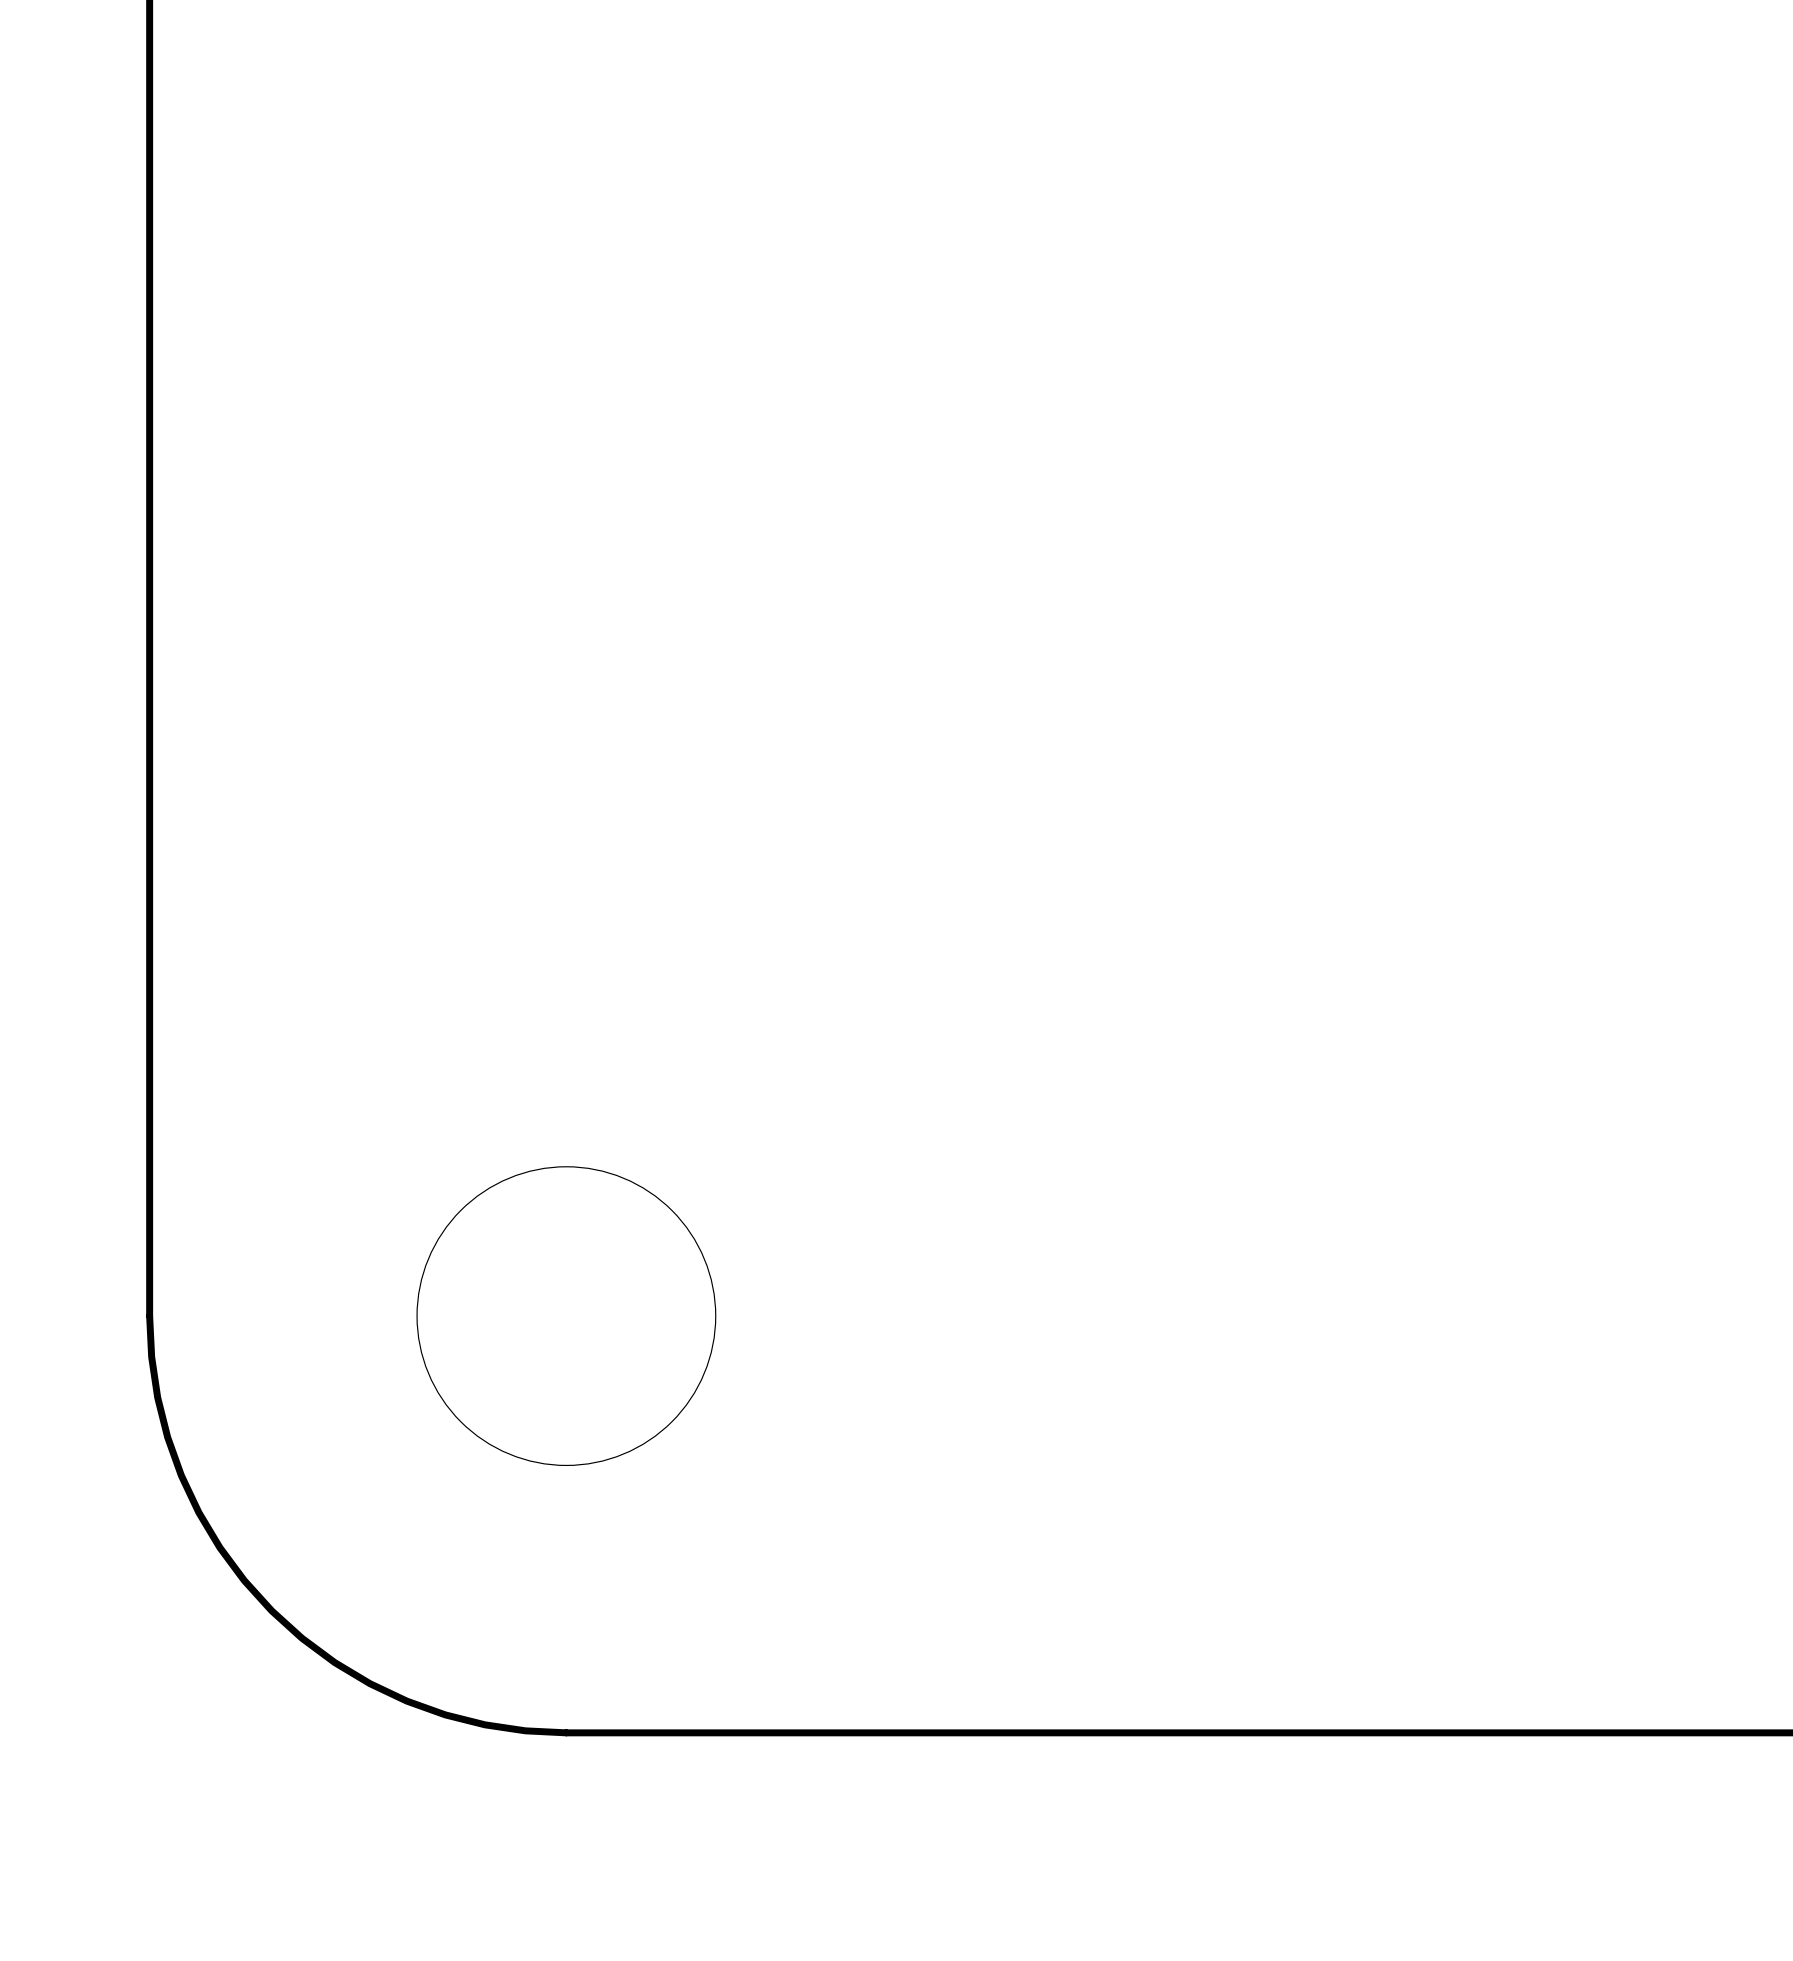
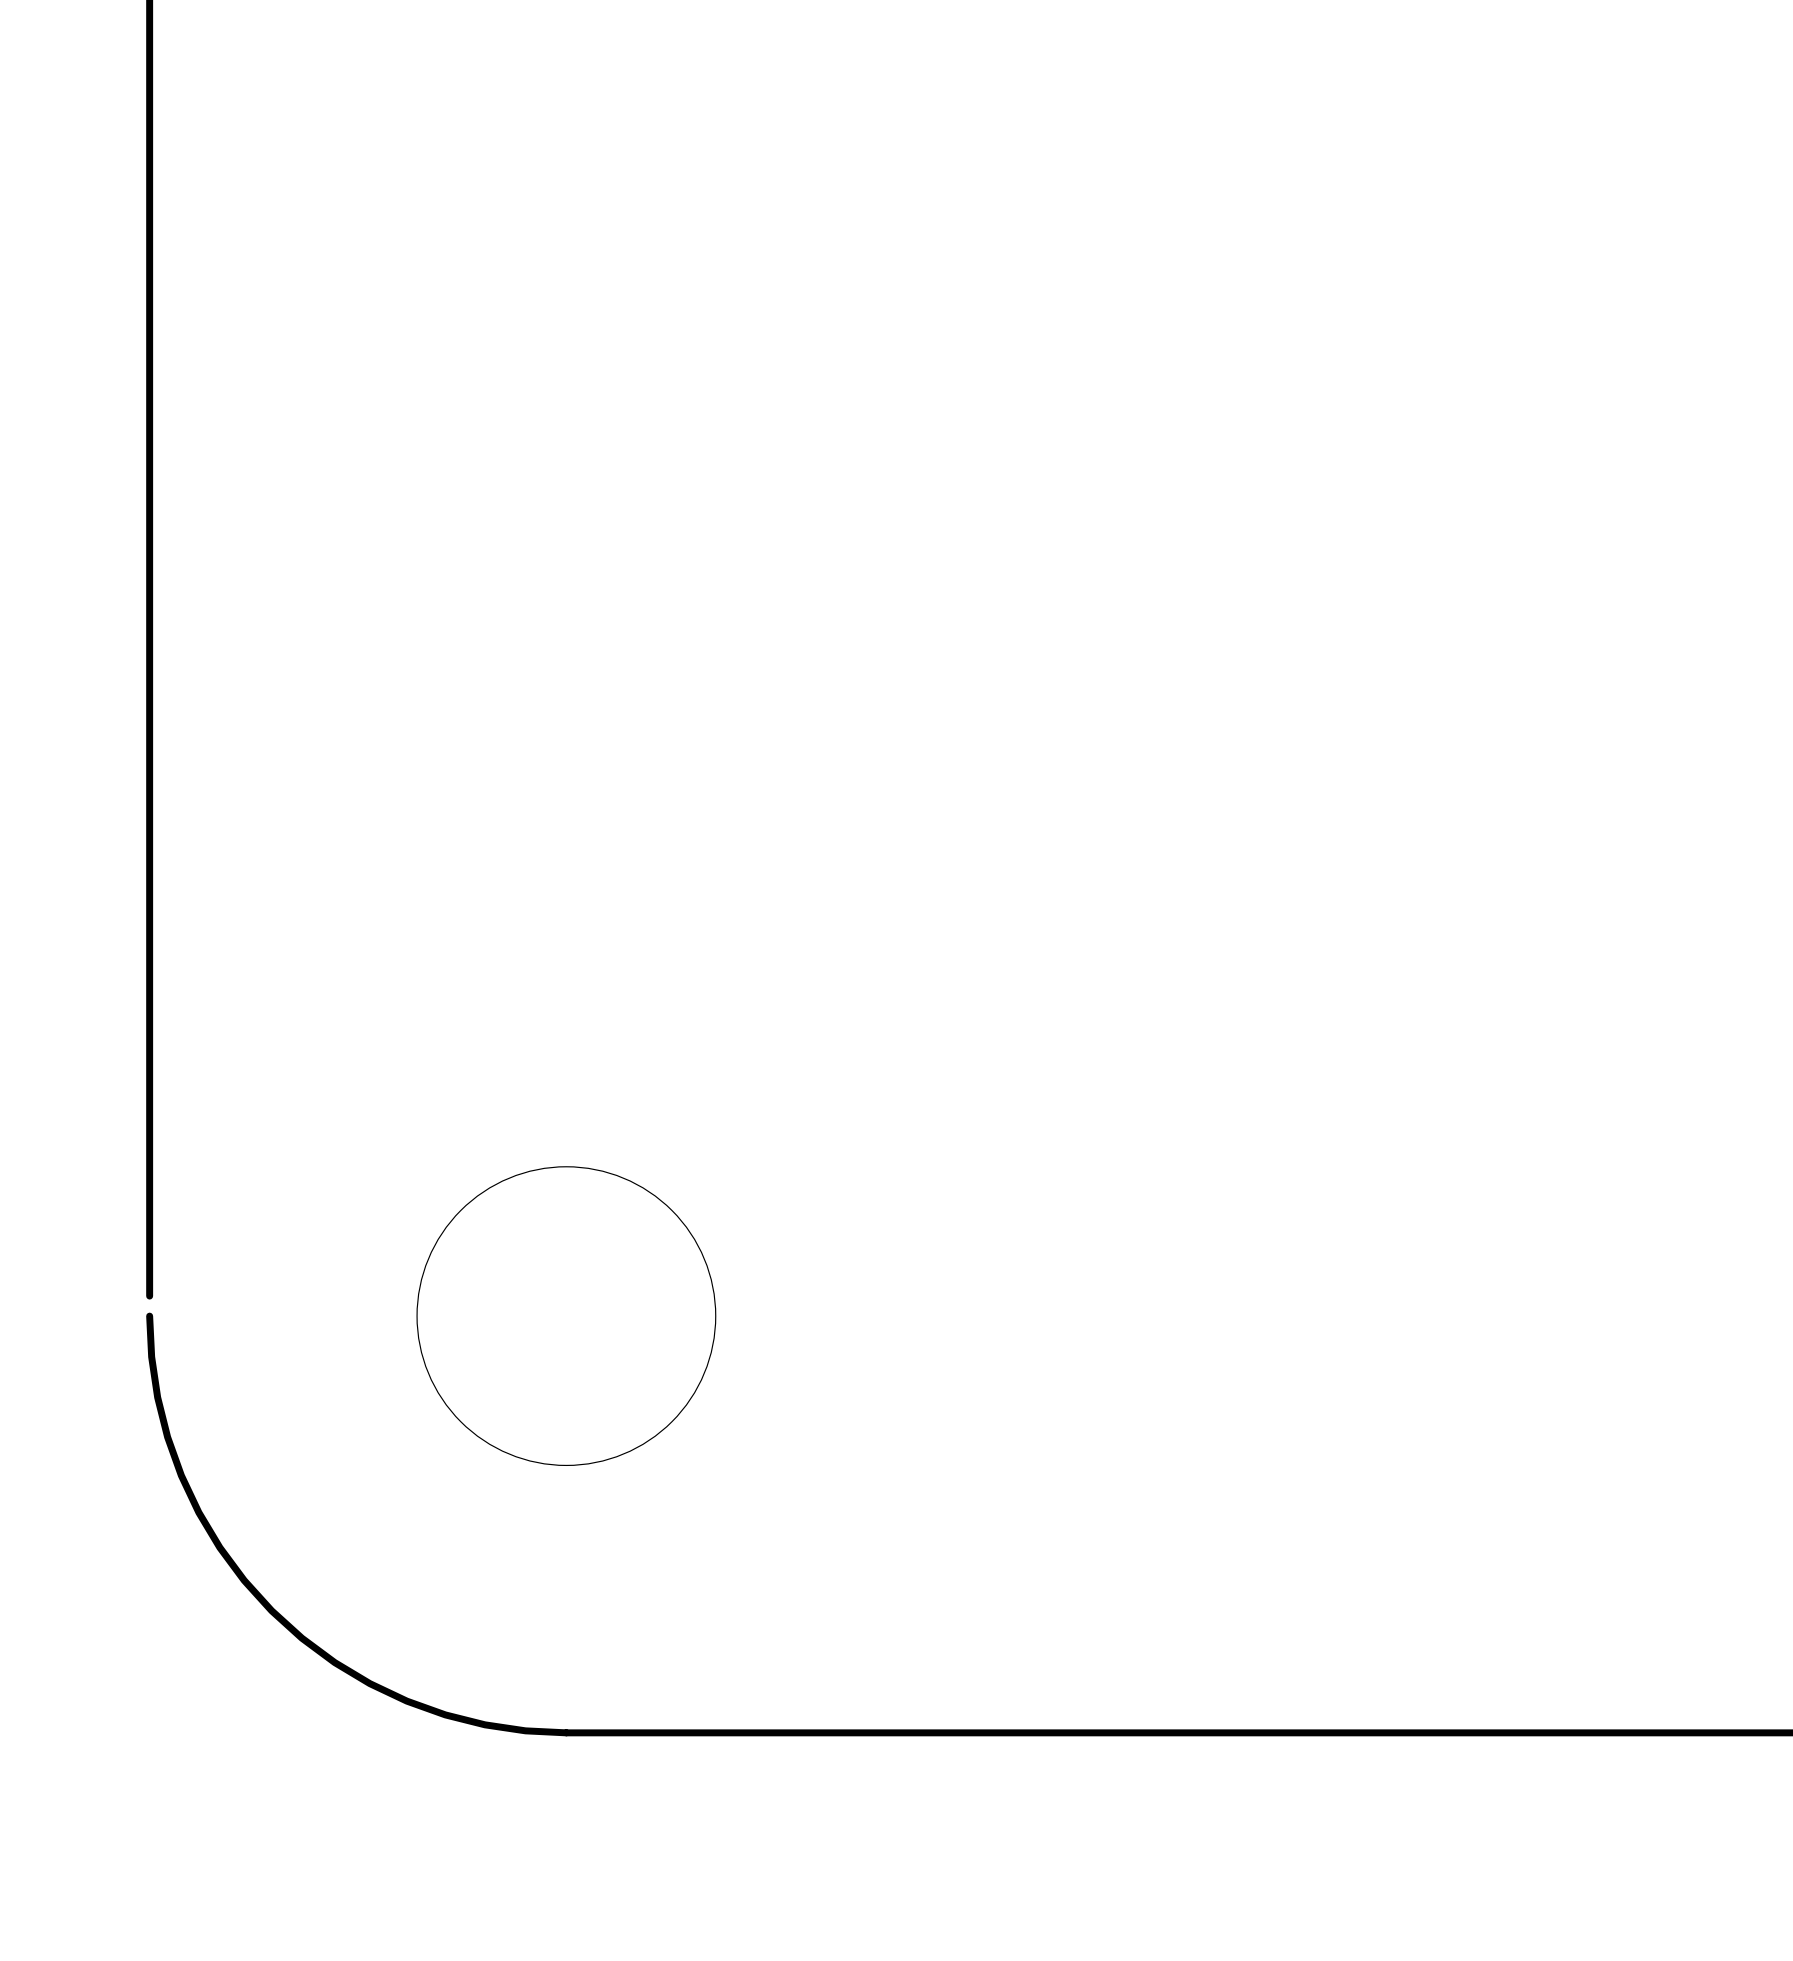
board edge: (149, 1296) (149, 1316) -> none

